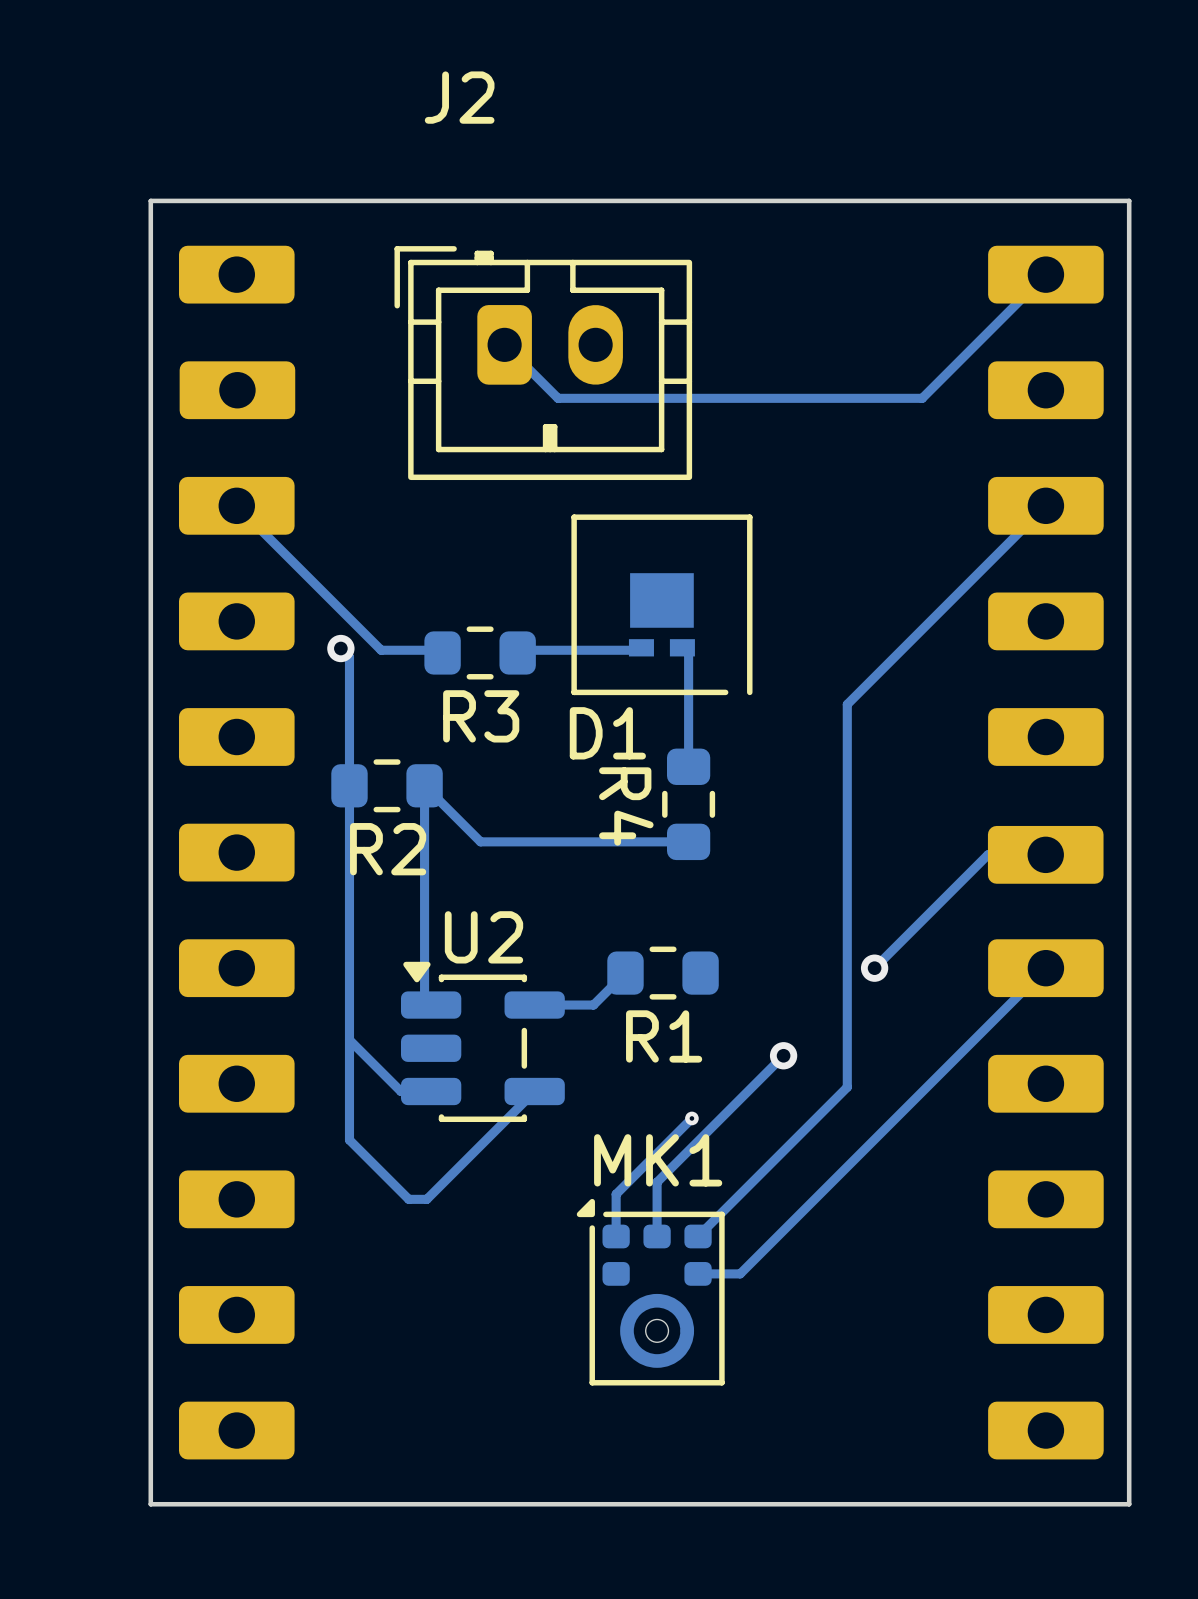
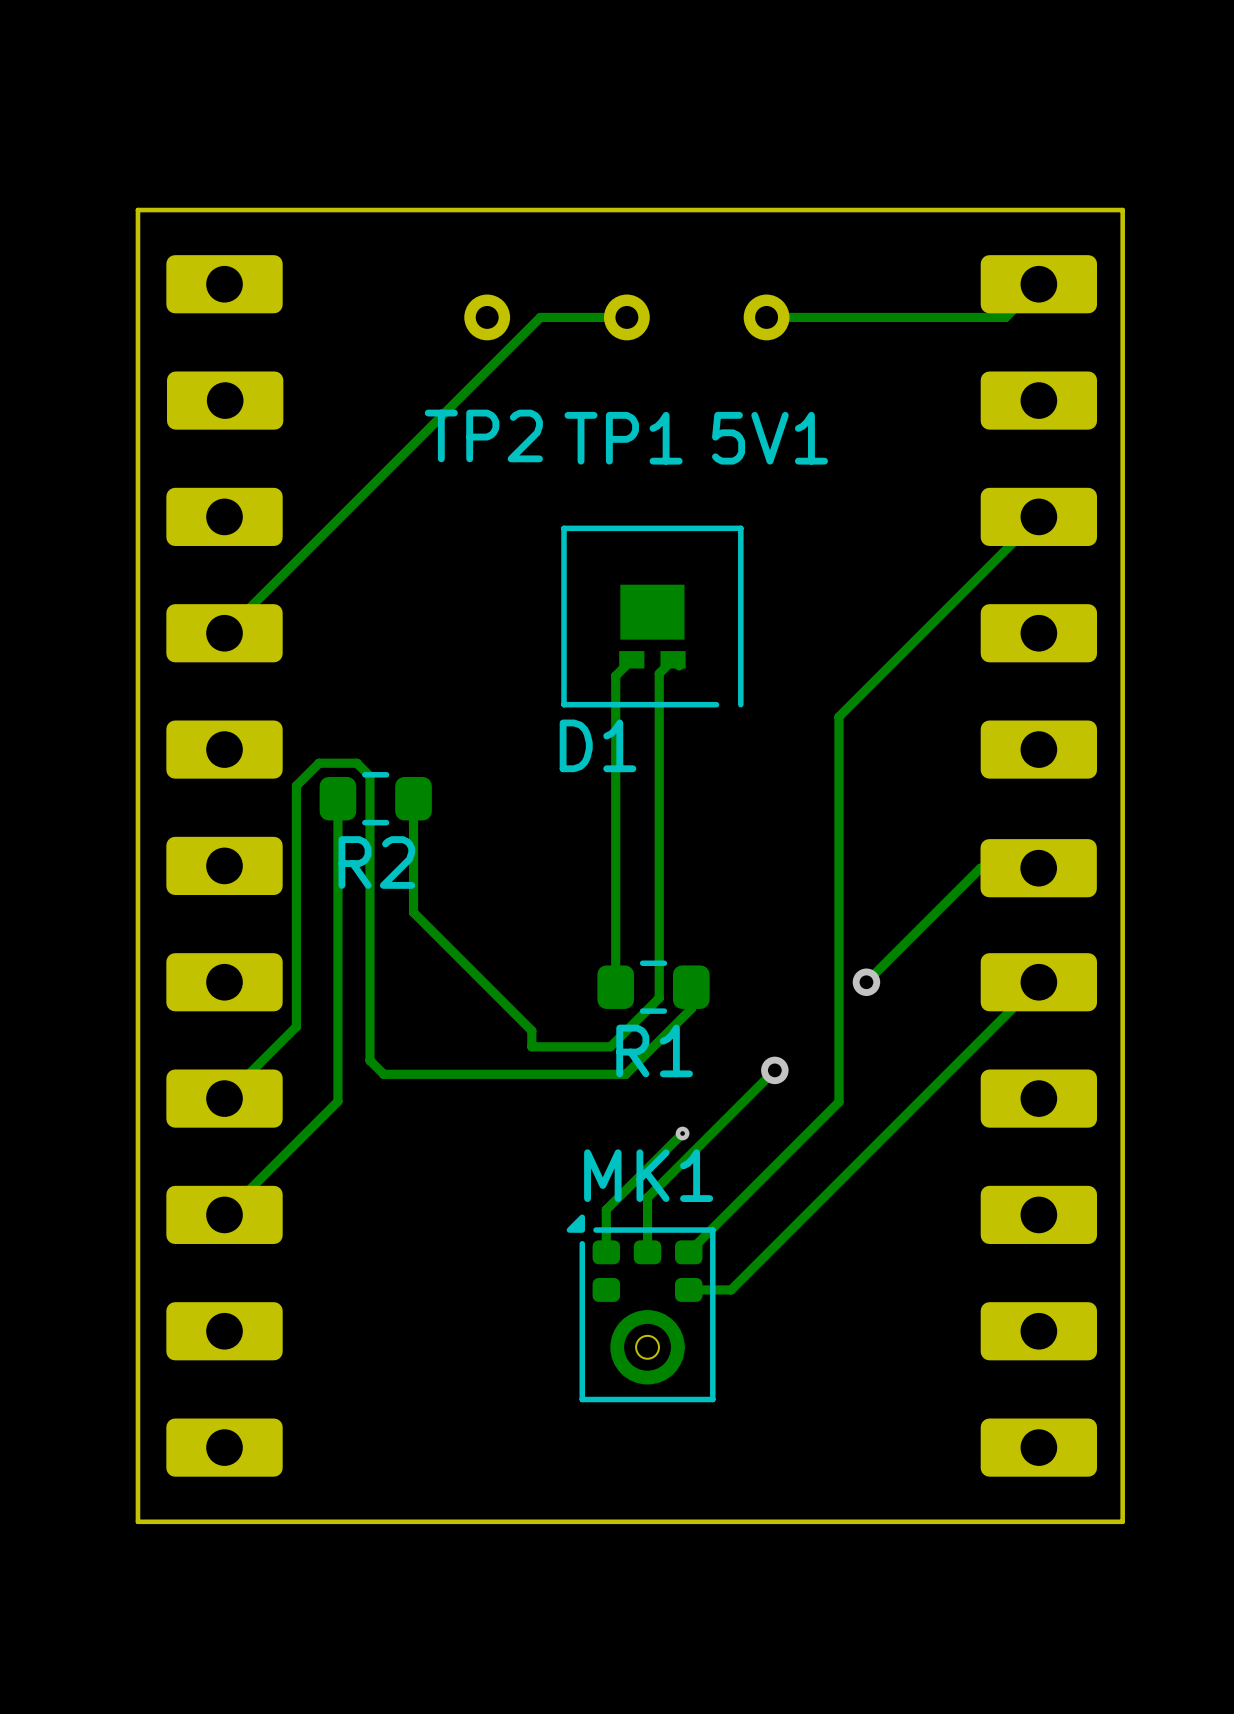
TP2: none -> (487, 317)
track: none -> (626, 317) (540, 317) (224, 633)
TP1: none -> (626, 317)
5V1: none -> (766, 317)
track: (1012, 307) (922, 398) (558, 398) (504, 344) -> (1005, 317) (766, 317)
J2: (543, 363) -> none
track: (236, 505) (381, 650) (439, 650) (442, 652) -> none
track: (340, 648) (349, 657) (349, 785) -> none
via: (340, 648) -> none
track: (639, 650) (520, 650) (517, 652) -> (629, 662) (615, 675) (615, 987)
R3: (480, 652) -> none
track: (688, 653) (688, 766) -> none
track: (424, 785) (480, 841) (688, 841) -> none
R4: (688, 804) -> none
track: (424, 898) (424, 998) (431, 1005) -> (413, 912) (531, 1030) (531, 1046) (610, 1046) (659, 998) (659, 673) (673, 659)
track: (625, 973) (593, 1005) (534, 1005) -> none
track: none -> (691, 987) (691, 1008) (625, 1074) (383, 1074) (370, 1060) (370, 776) (356, 763) (319, 763) (296, 785) (296, 1026) (224, 1098)
track: (349, 1039) (401, 1091) (431, 1091) -> none
U2: (482, 1041) -> none
track: (349, 1086) (349, 1140) (408, 1199) (426, 1199) (534, 1091) -> (337, 1101) (224, 1214)

